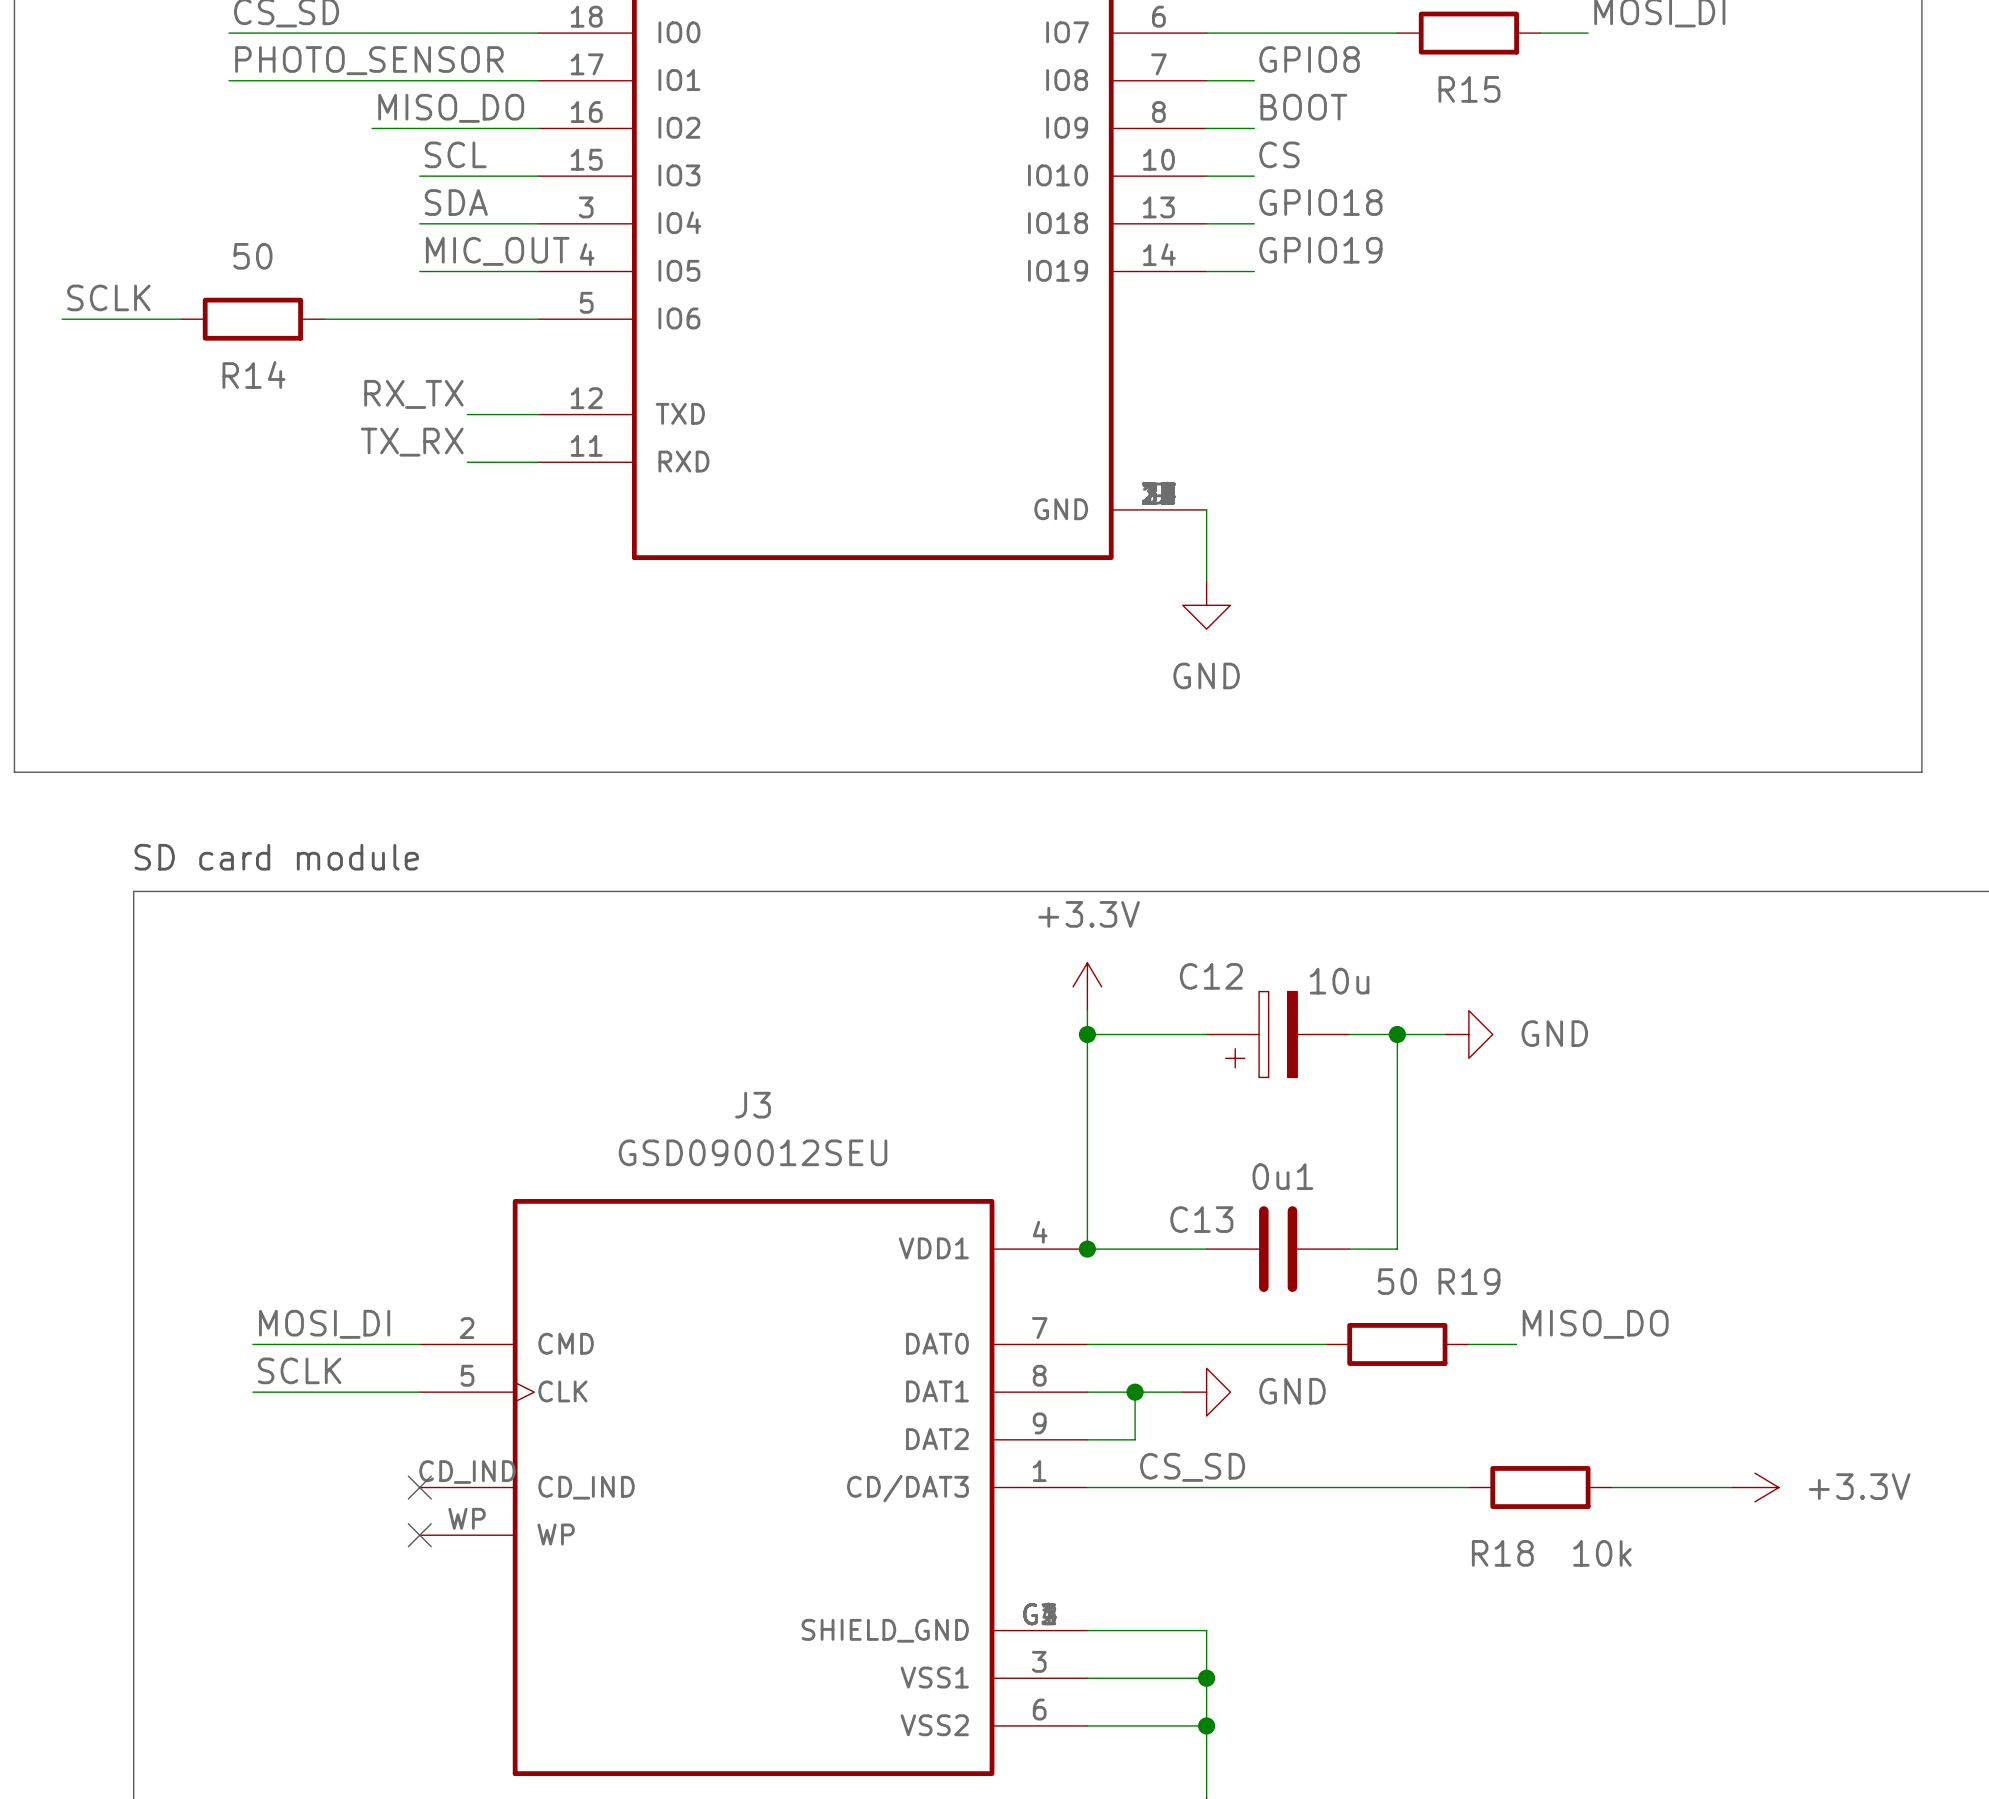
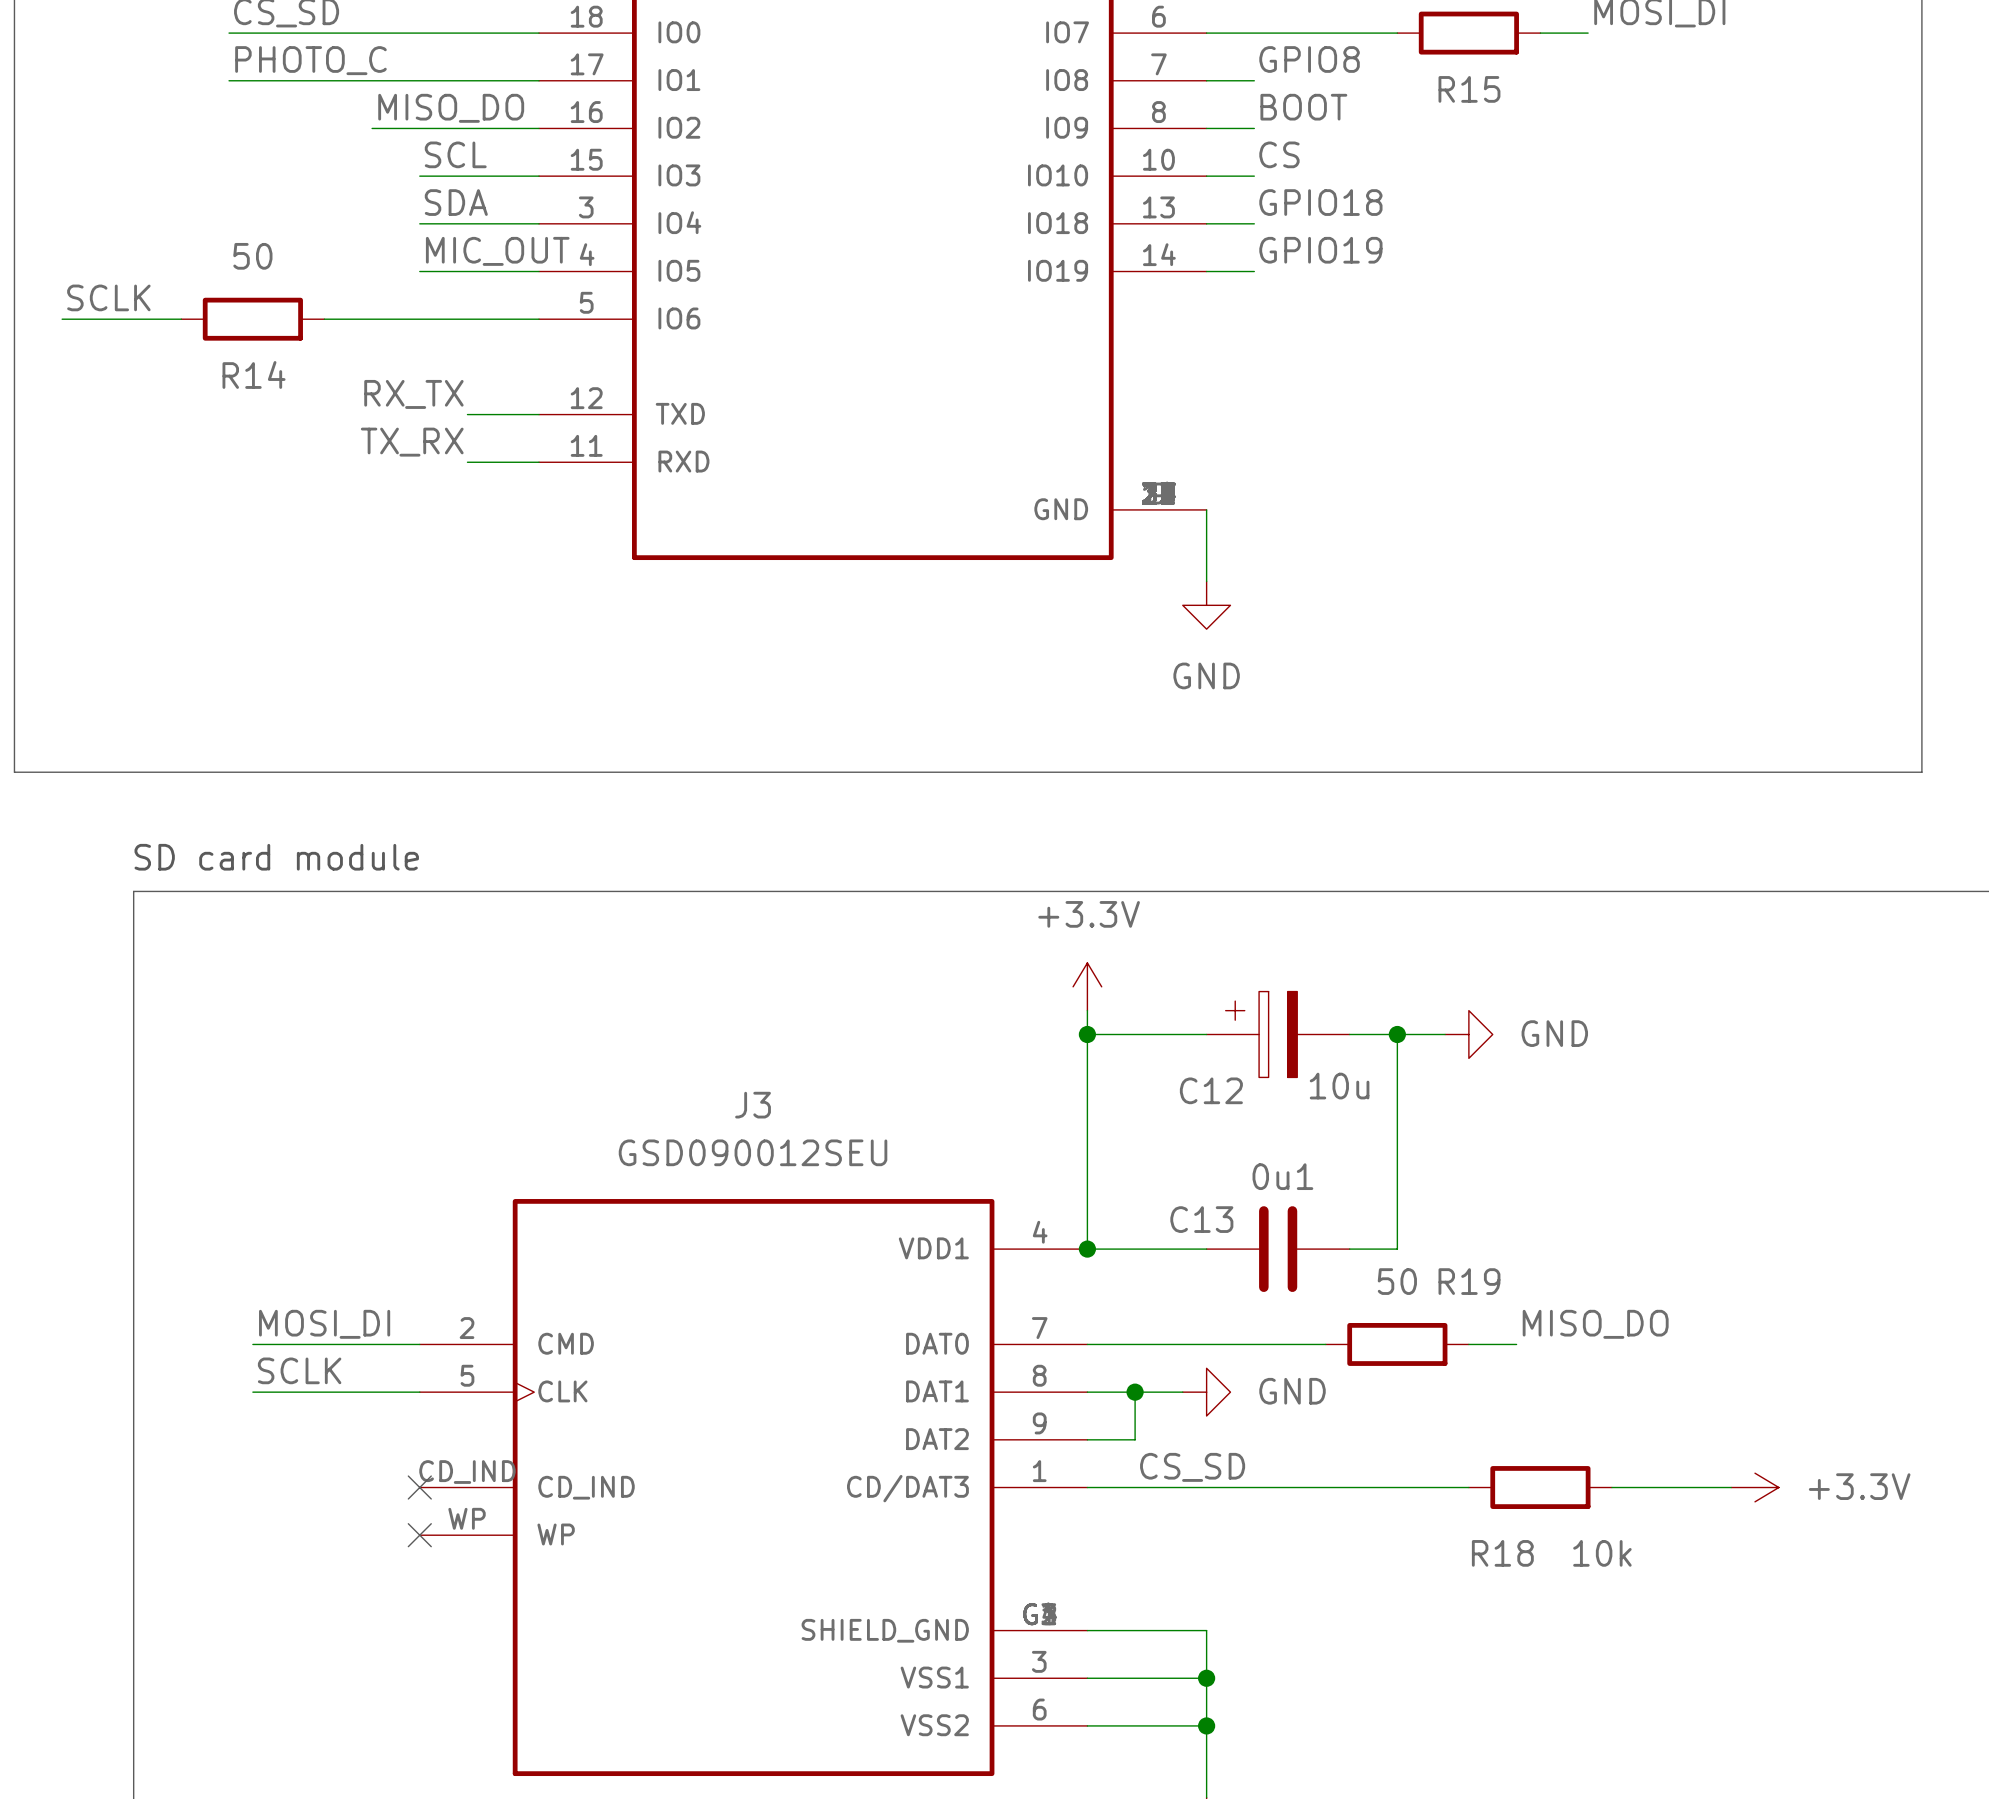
label: PHOTO_SENSOR (369, 60) -> PHOTO_C (310, 60)
C12 flip: as is (1261, 1034) -> up-down (1261, 1034)

